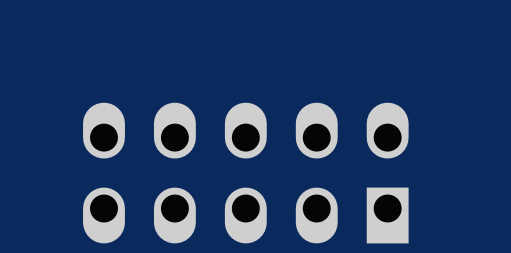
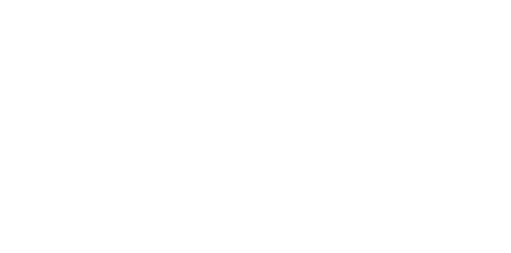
part: (245, 173) -> none

